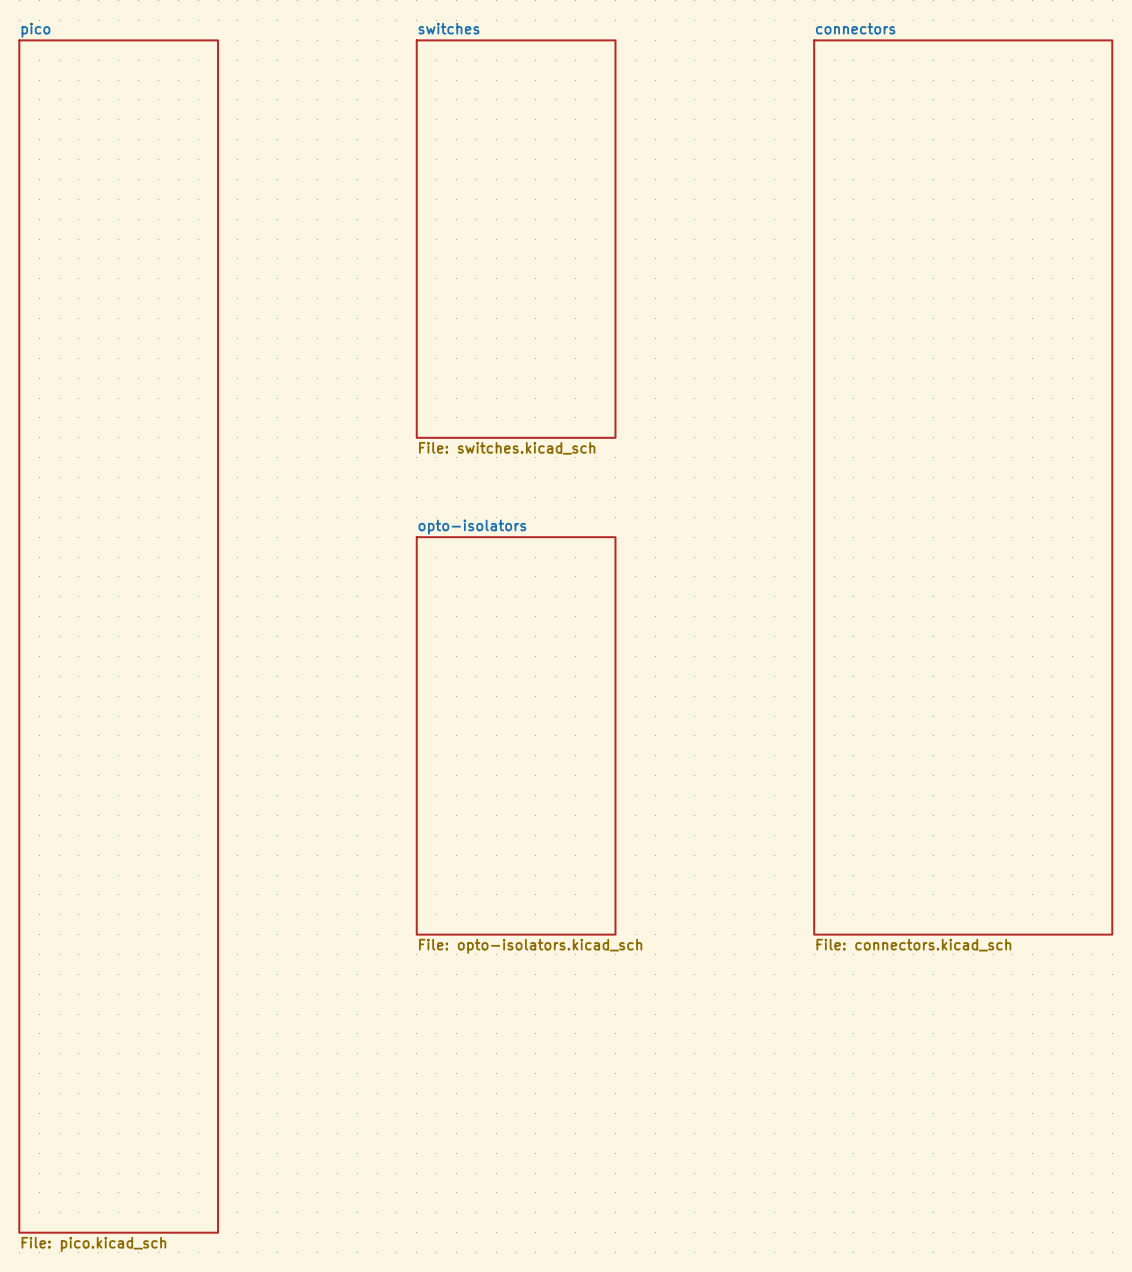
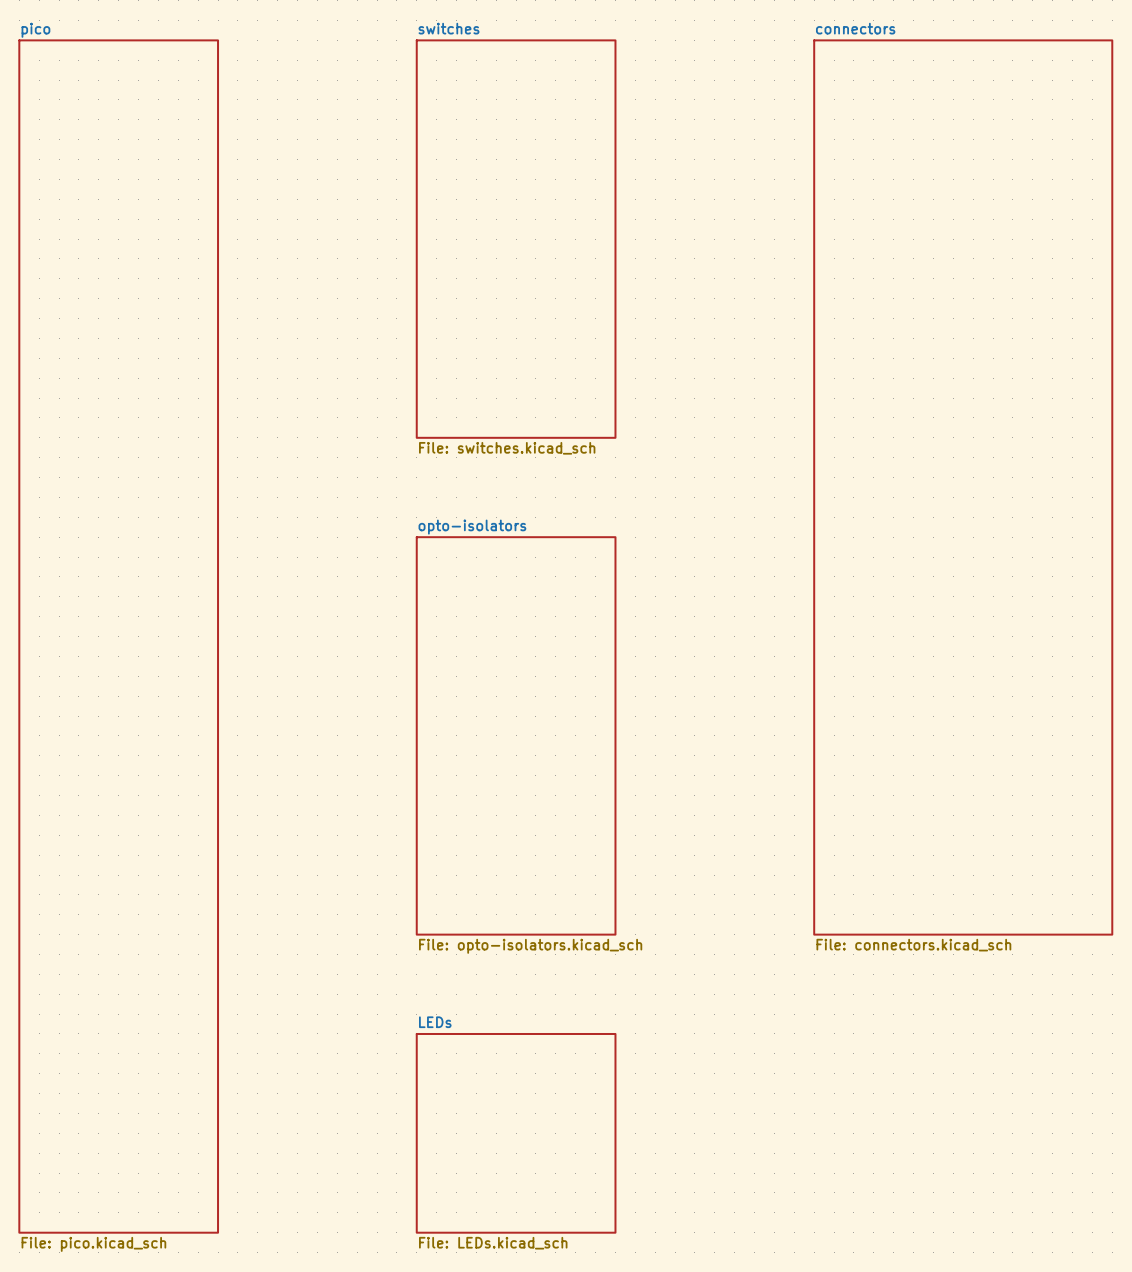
sheet LEDs: none -> File: LEDs.kicad_sch (516, 1133)

